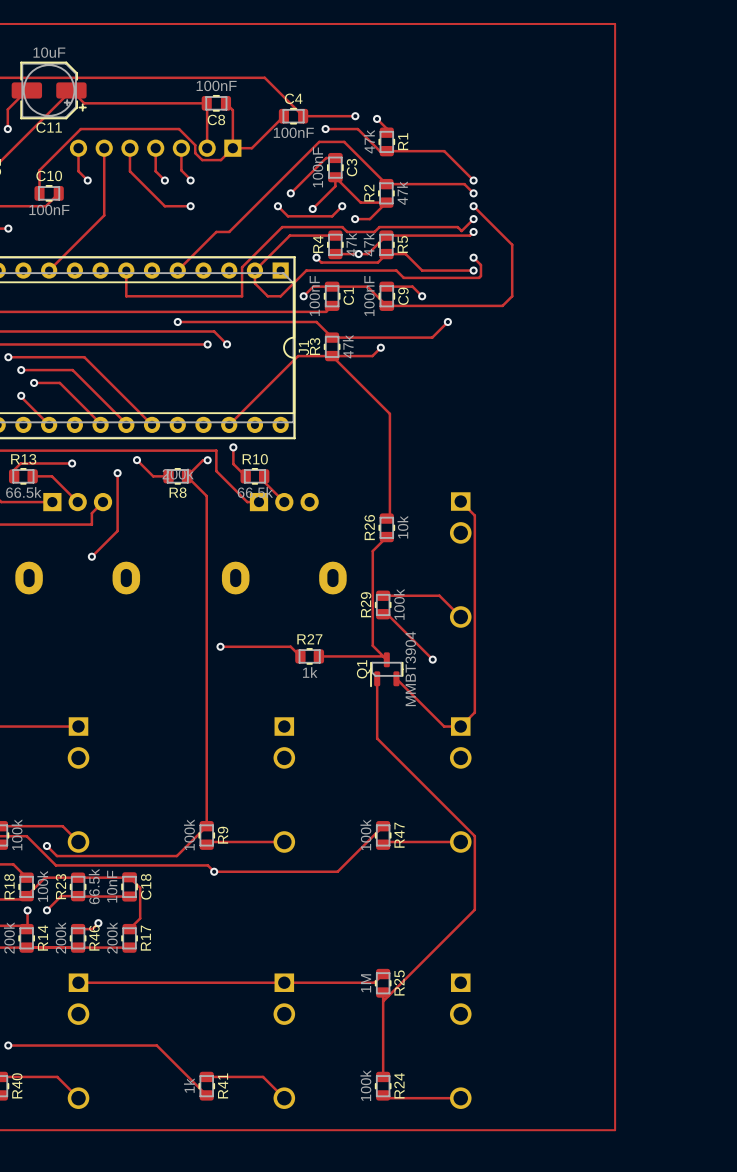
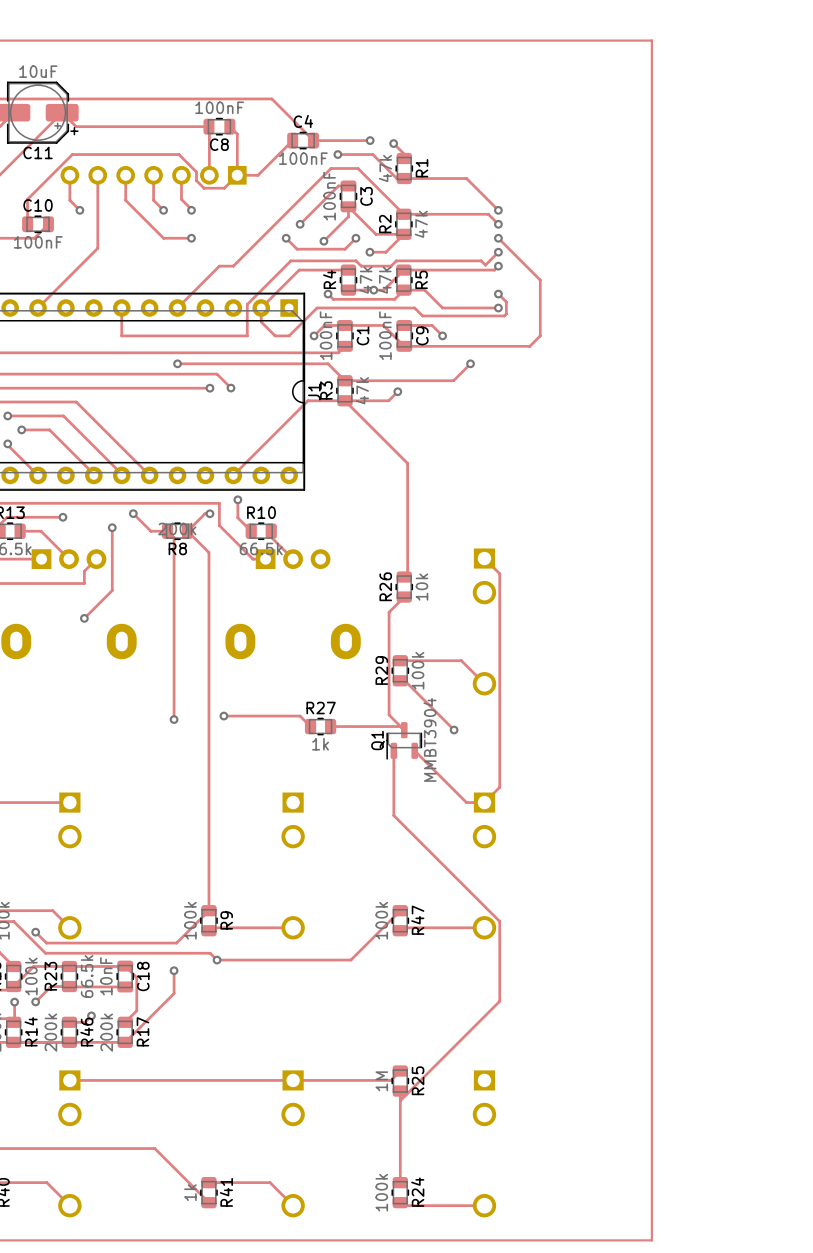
track: none -> (167, 531) (174, 537) (174, 719)
via: none -> (174, 719)
track: none -> (174, 970) (174, 993) (125, 1042)
via: none -> (174, 970)

